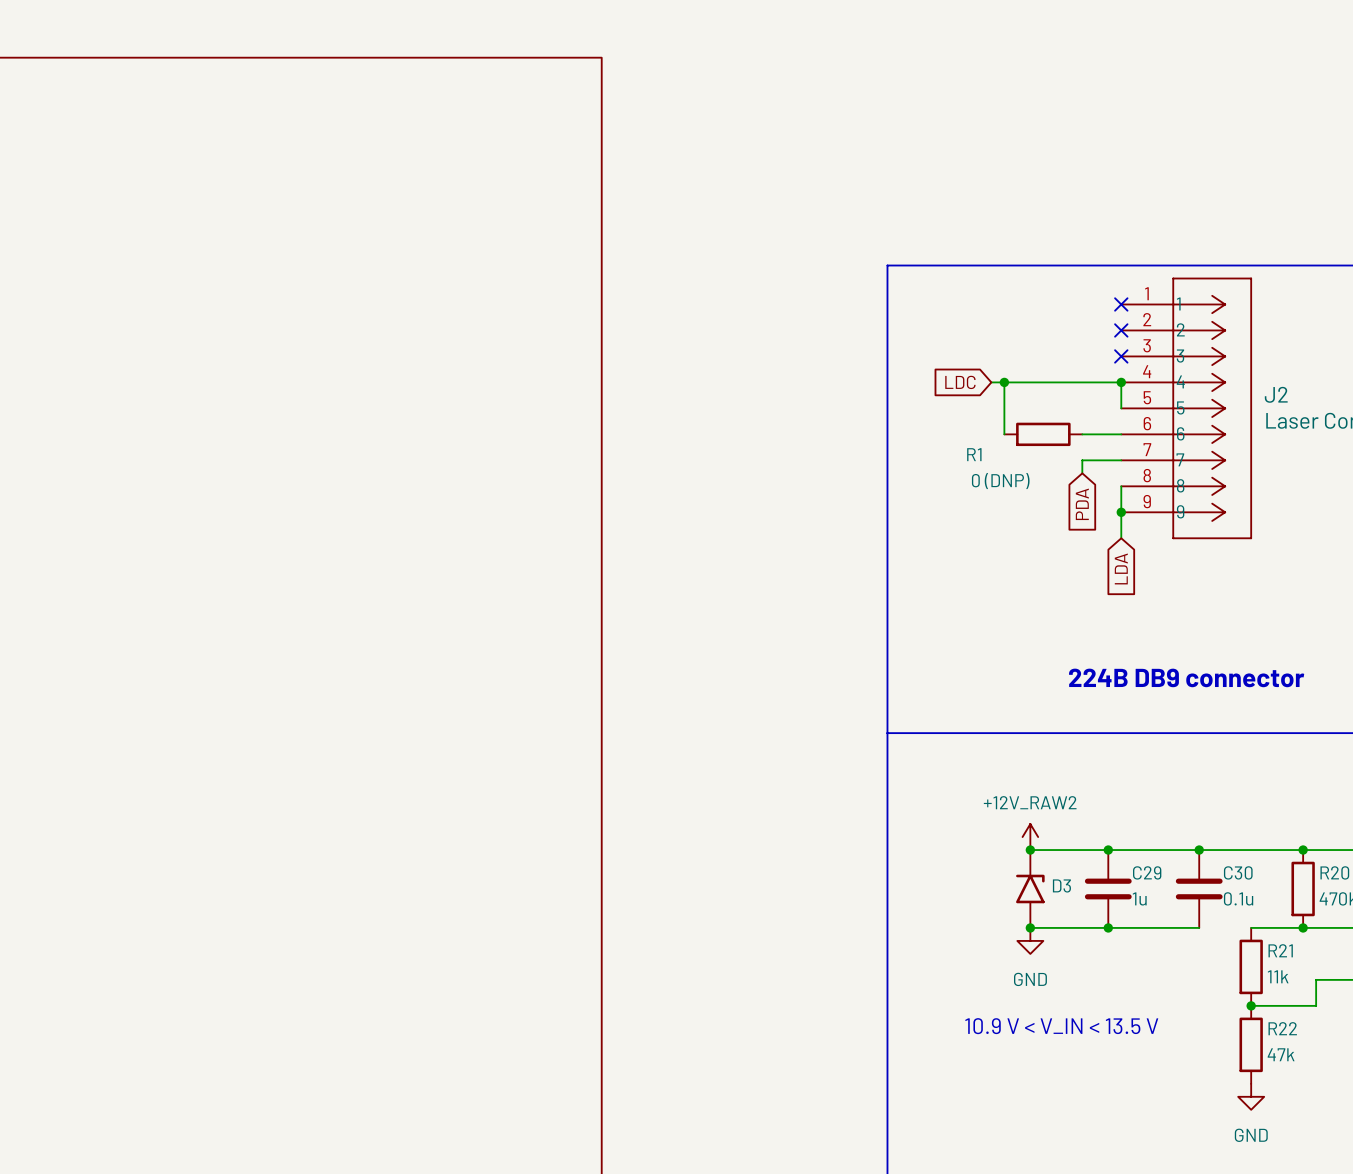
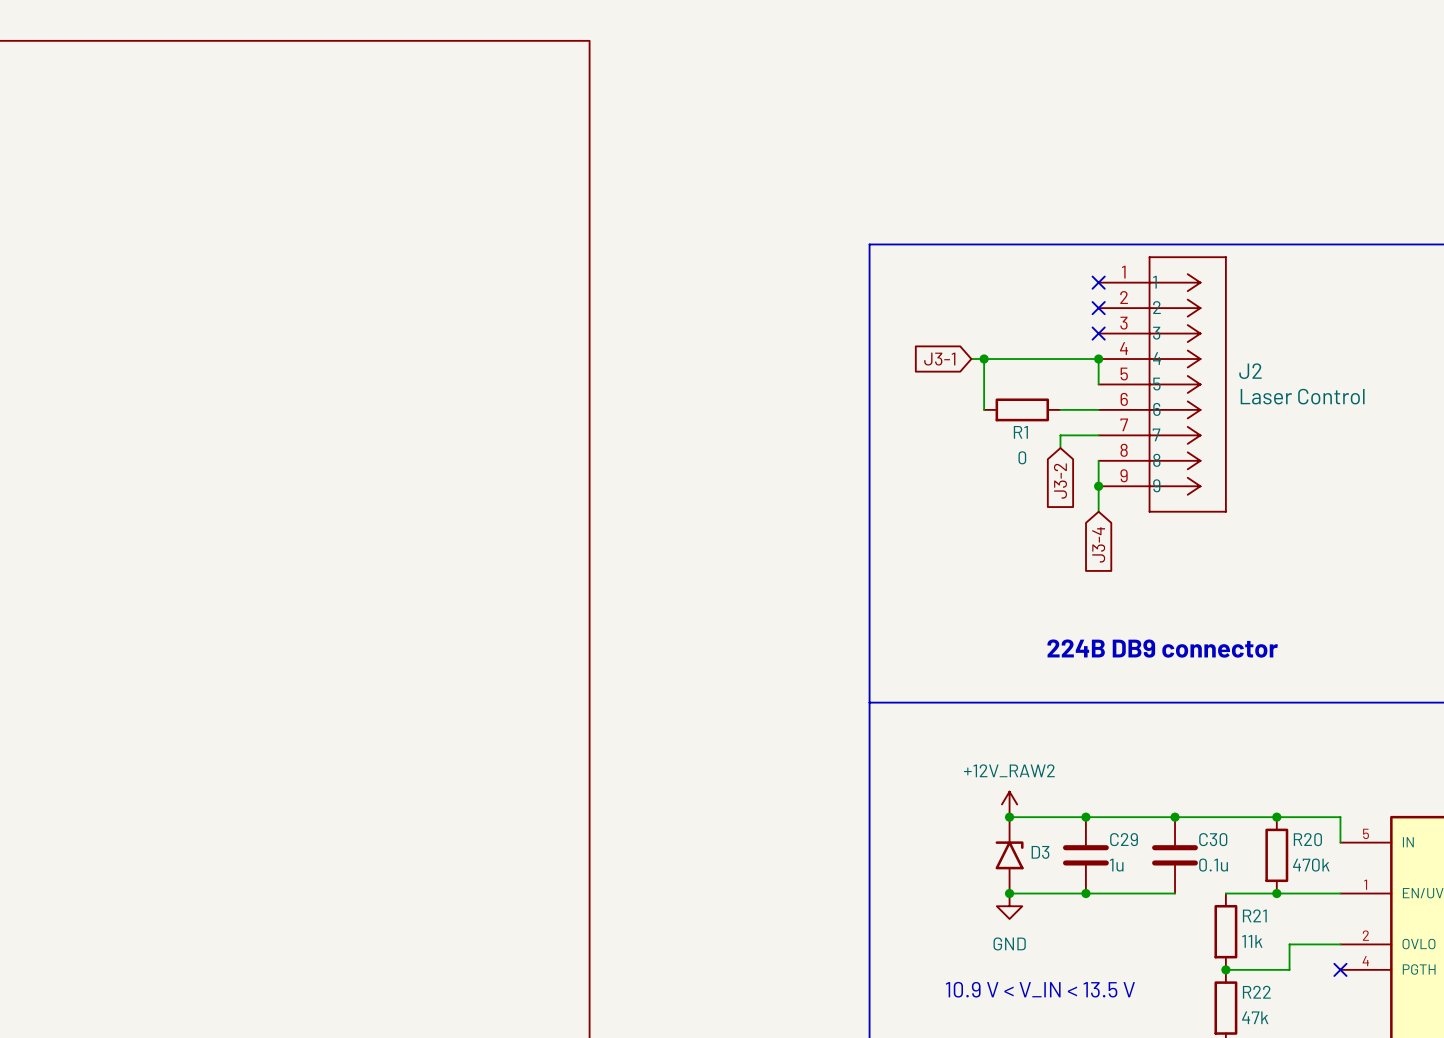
global label: LDC (960, 382) -> J3-1 (939, 359)
R1 name position: R1 (974, 454) -> R1 (1020, 432)
R1 value: 0 (DNP) (1000, 481) -> 0 (1022, 457)
global label: PDA (1082, 504) -> J3-2 (1060, 481)
global label: LDA (1121, 568) -> J3-4 (1098, 544)

